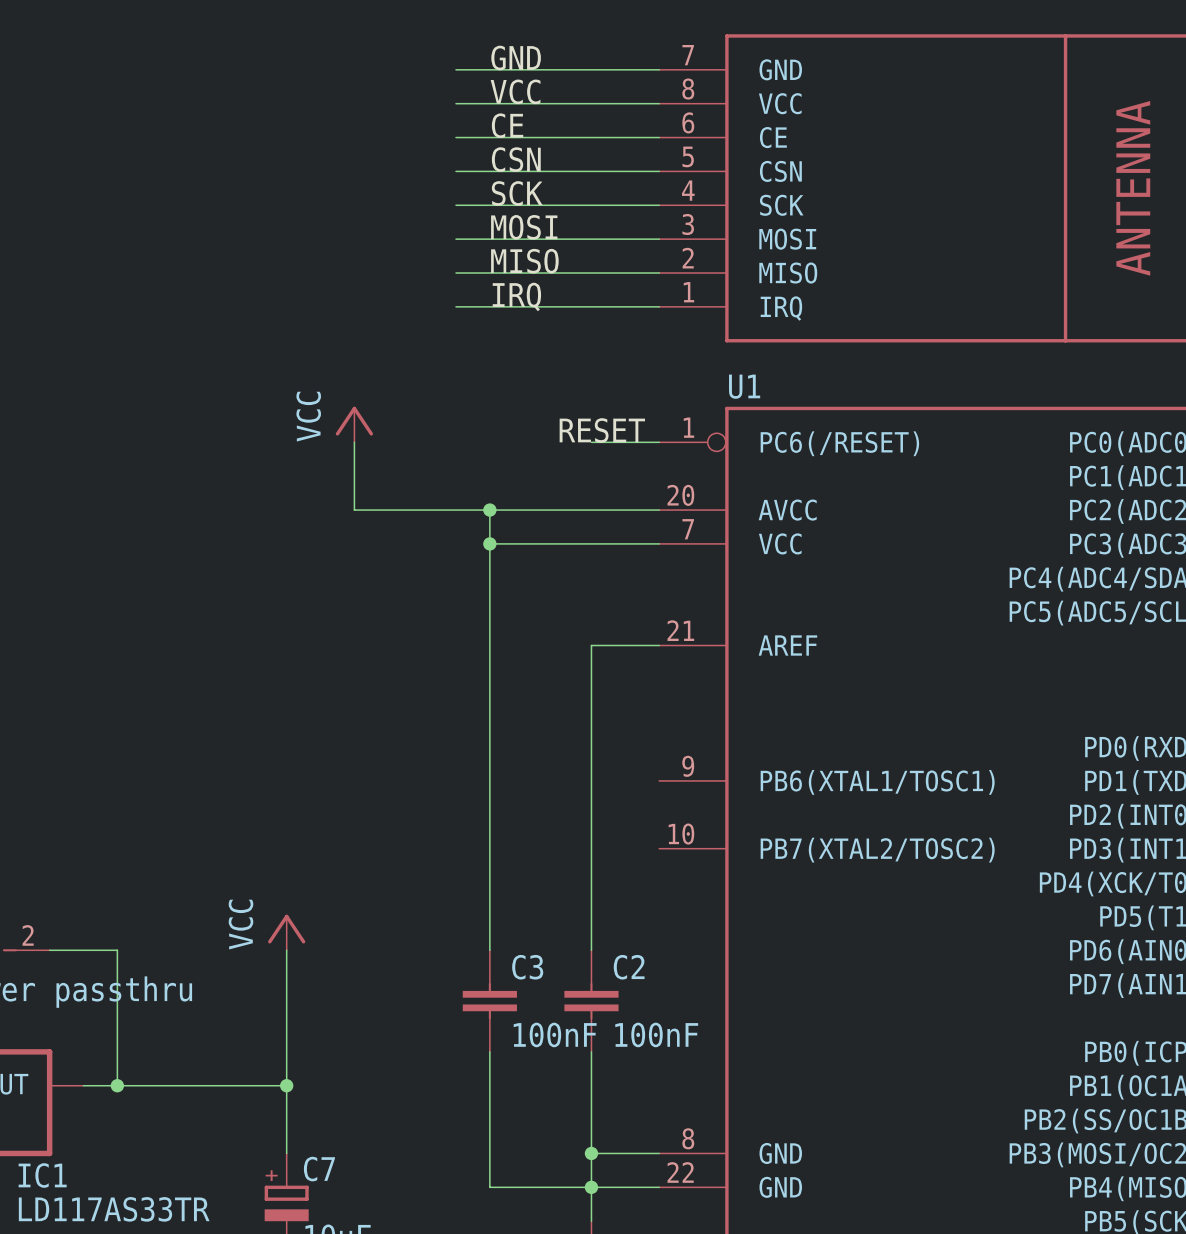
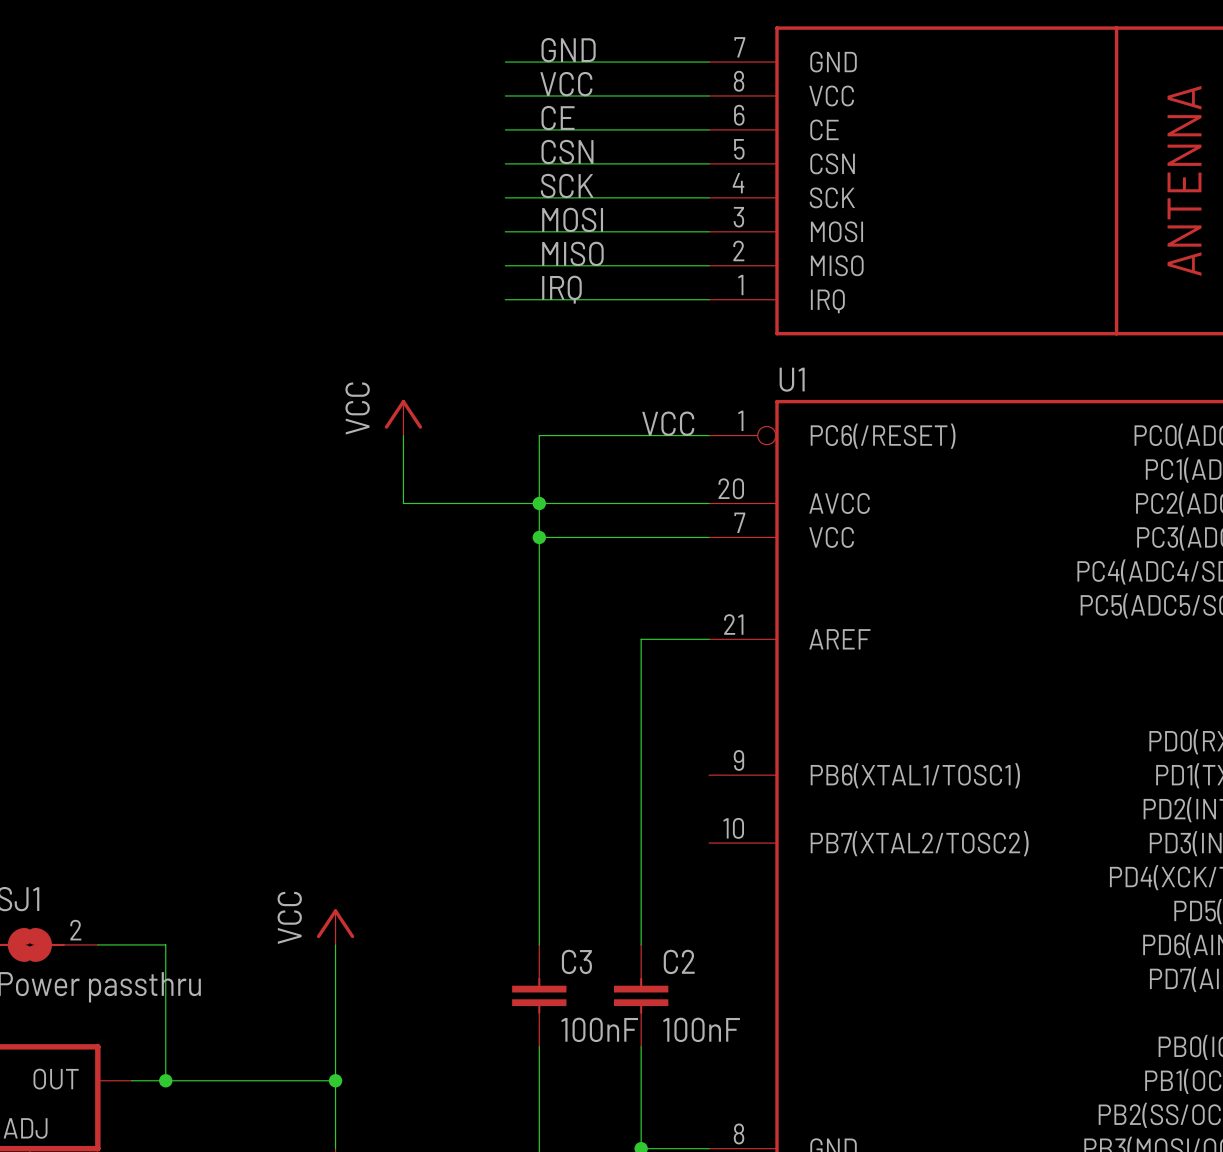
label: RESET (602, 430) -> none
label: none -> VCC (668, 423)
wire: none -> (641, 435) (539, 435) (539, 503)

